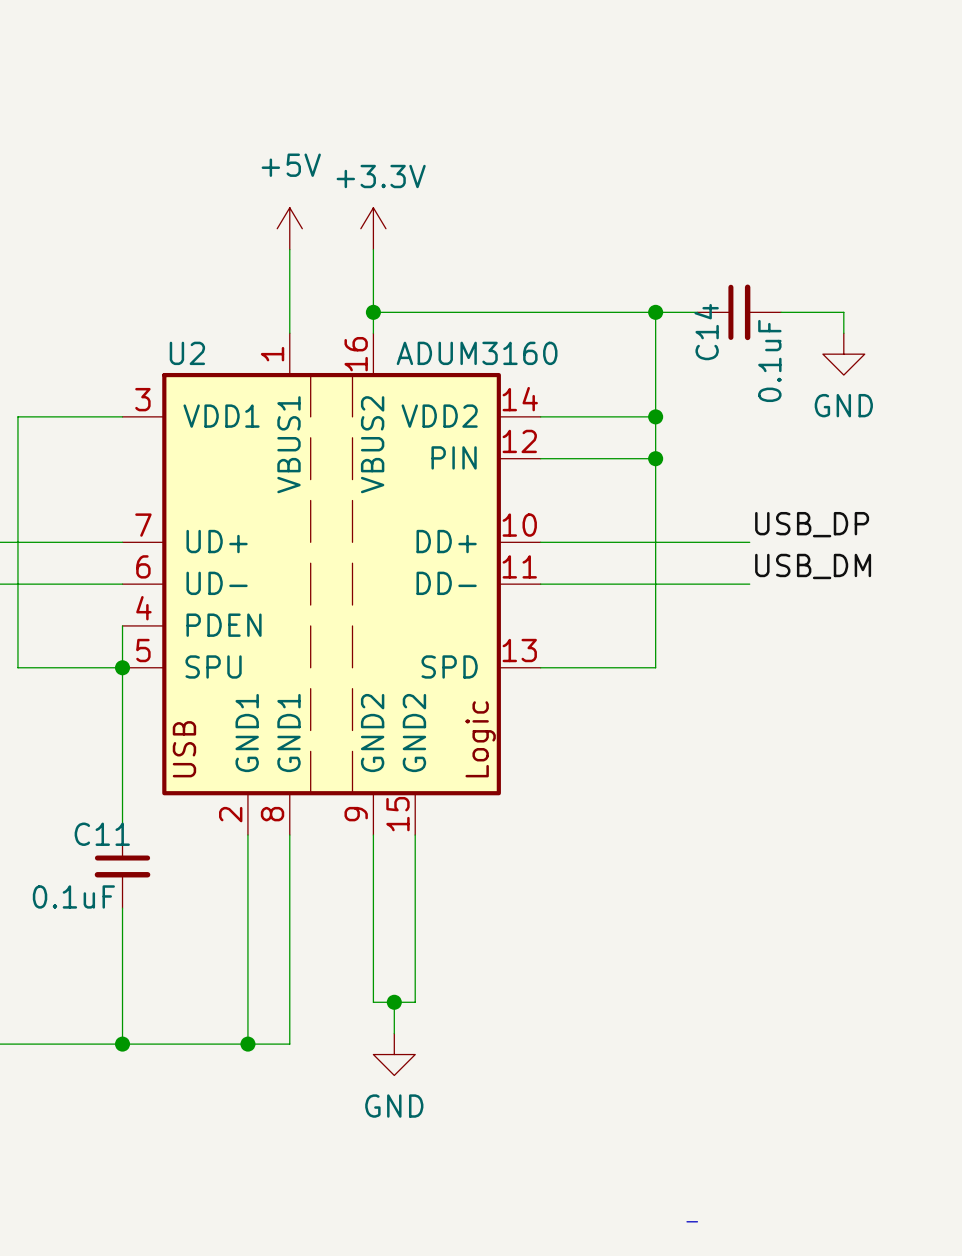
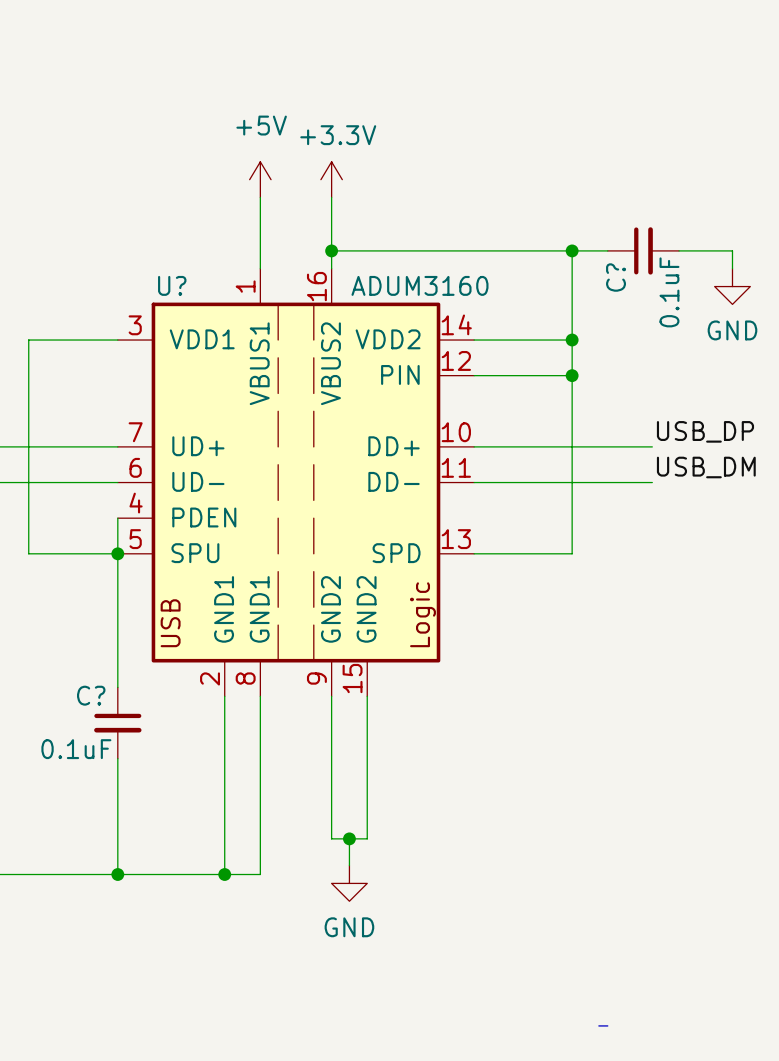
C14 name: C14 (706, 332) -> C? (616, 277)
U2 name: U2 (187, 353) -> U? (172, 285)
C11 name: C11 (102, 834) -> C? (91, 695)

